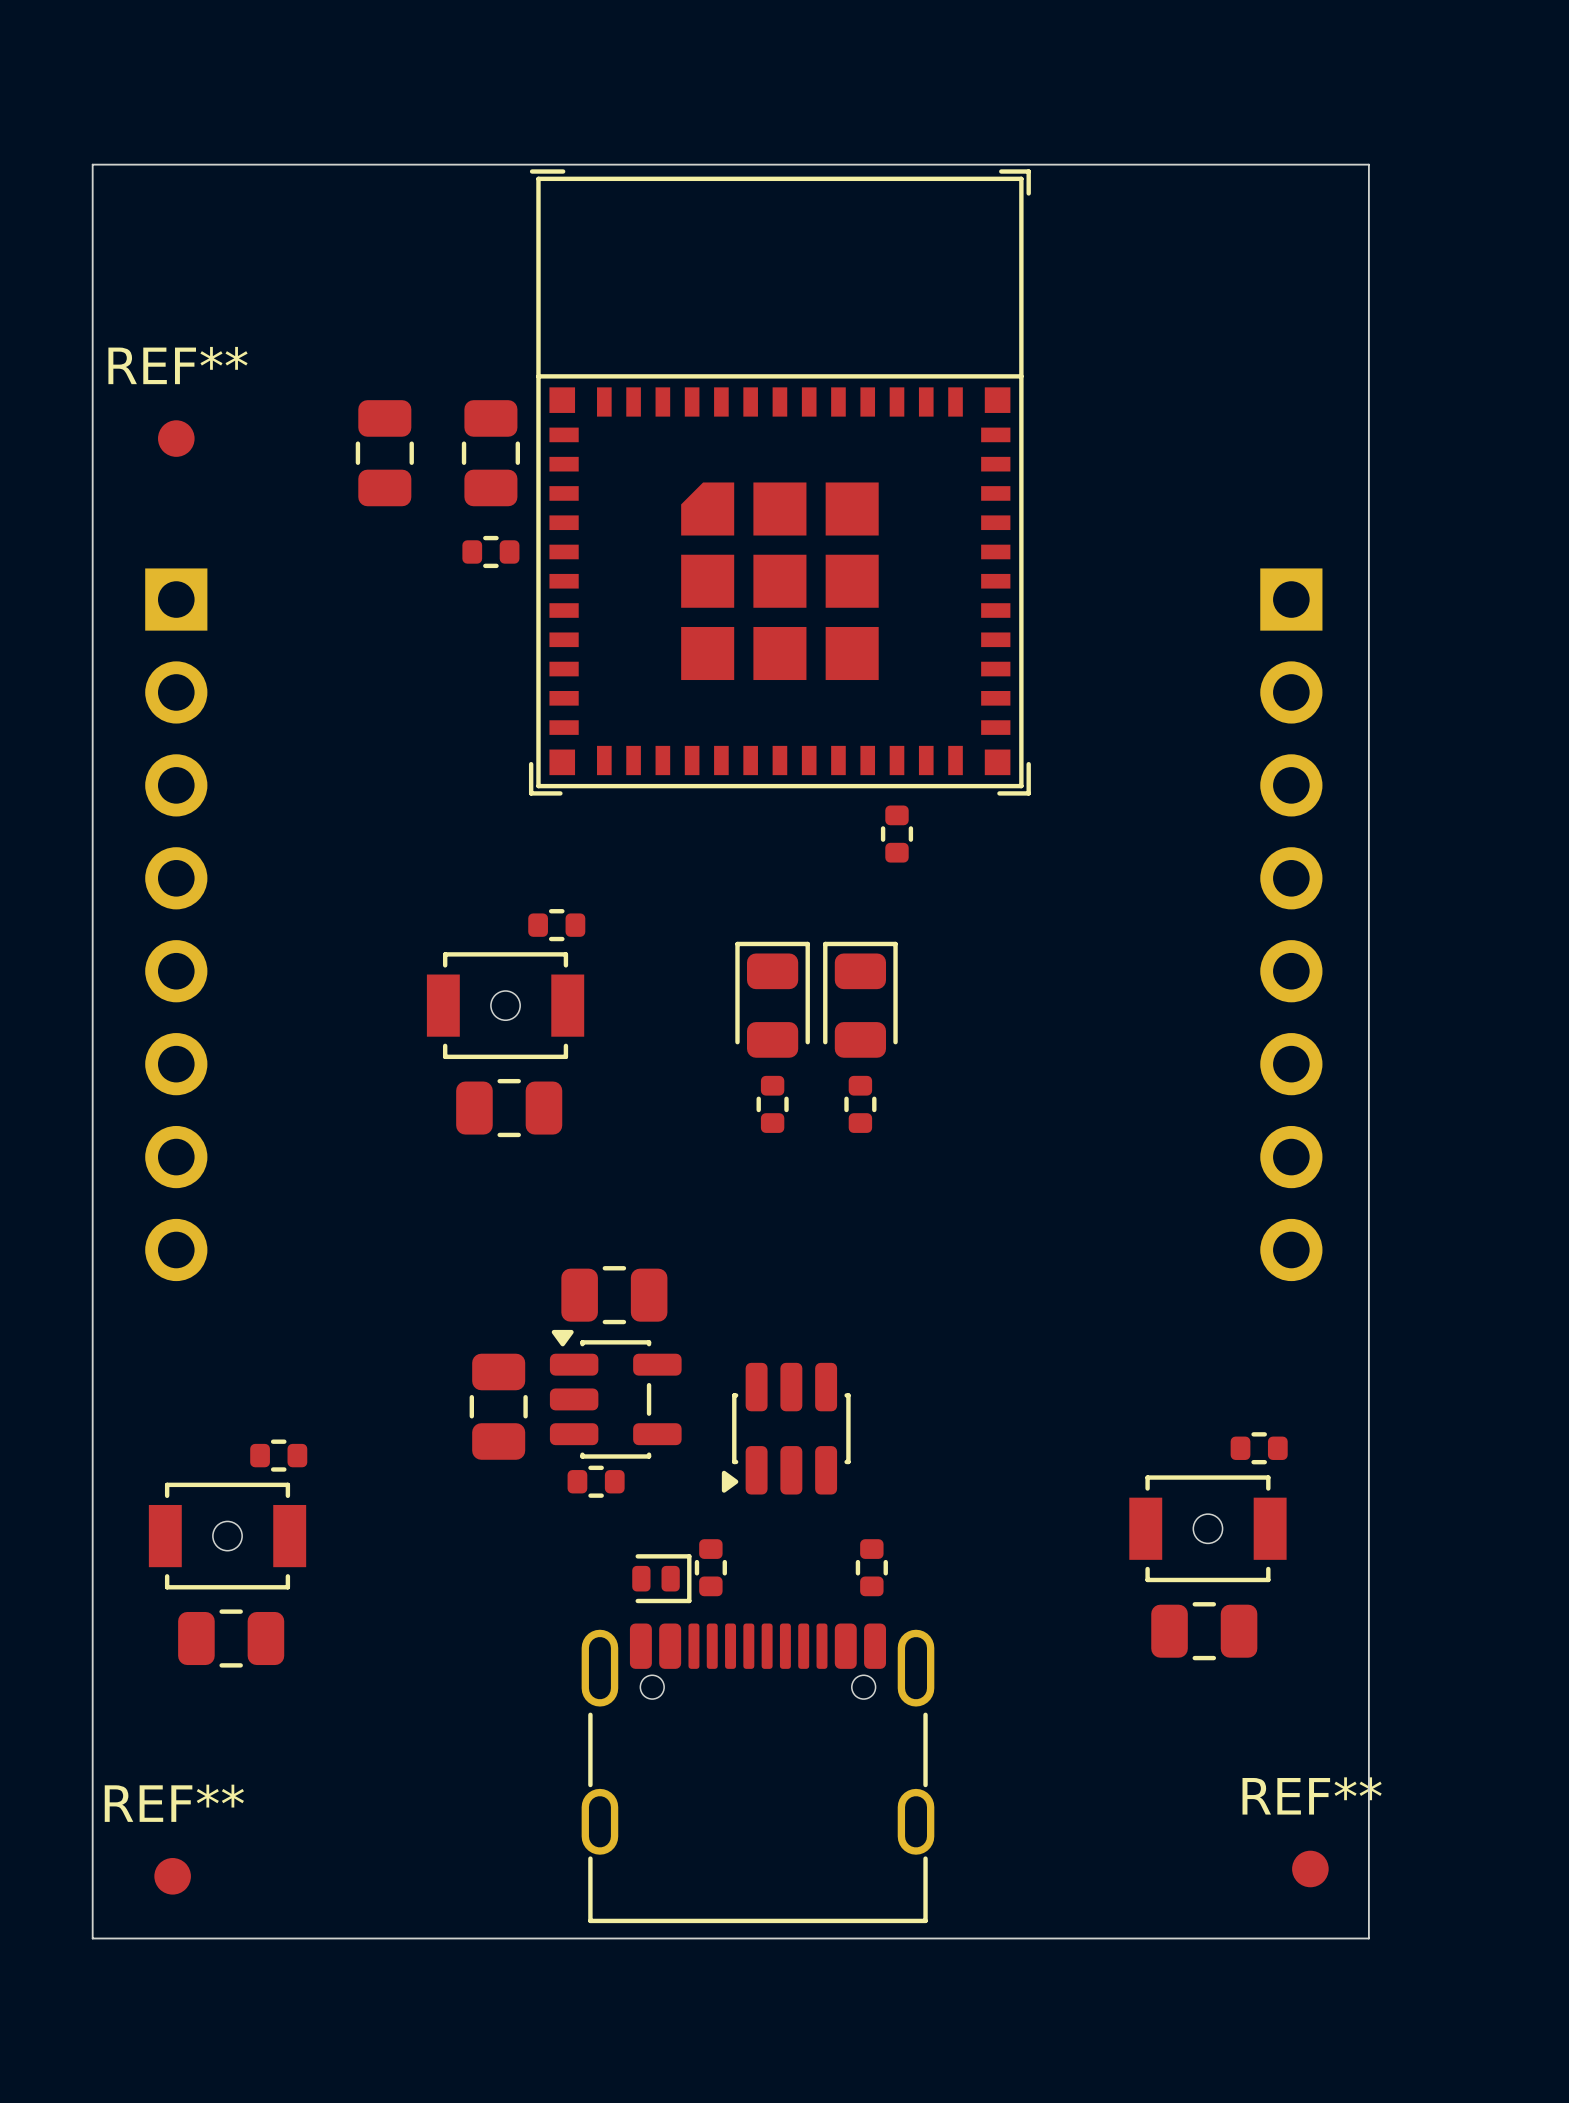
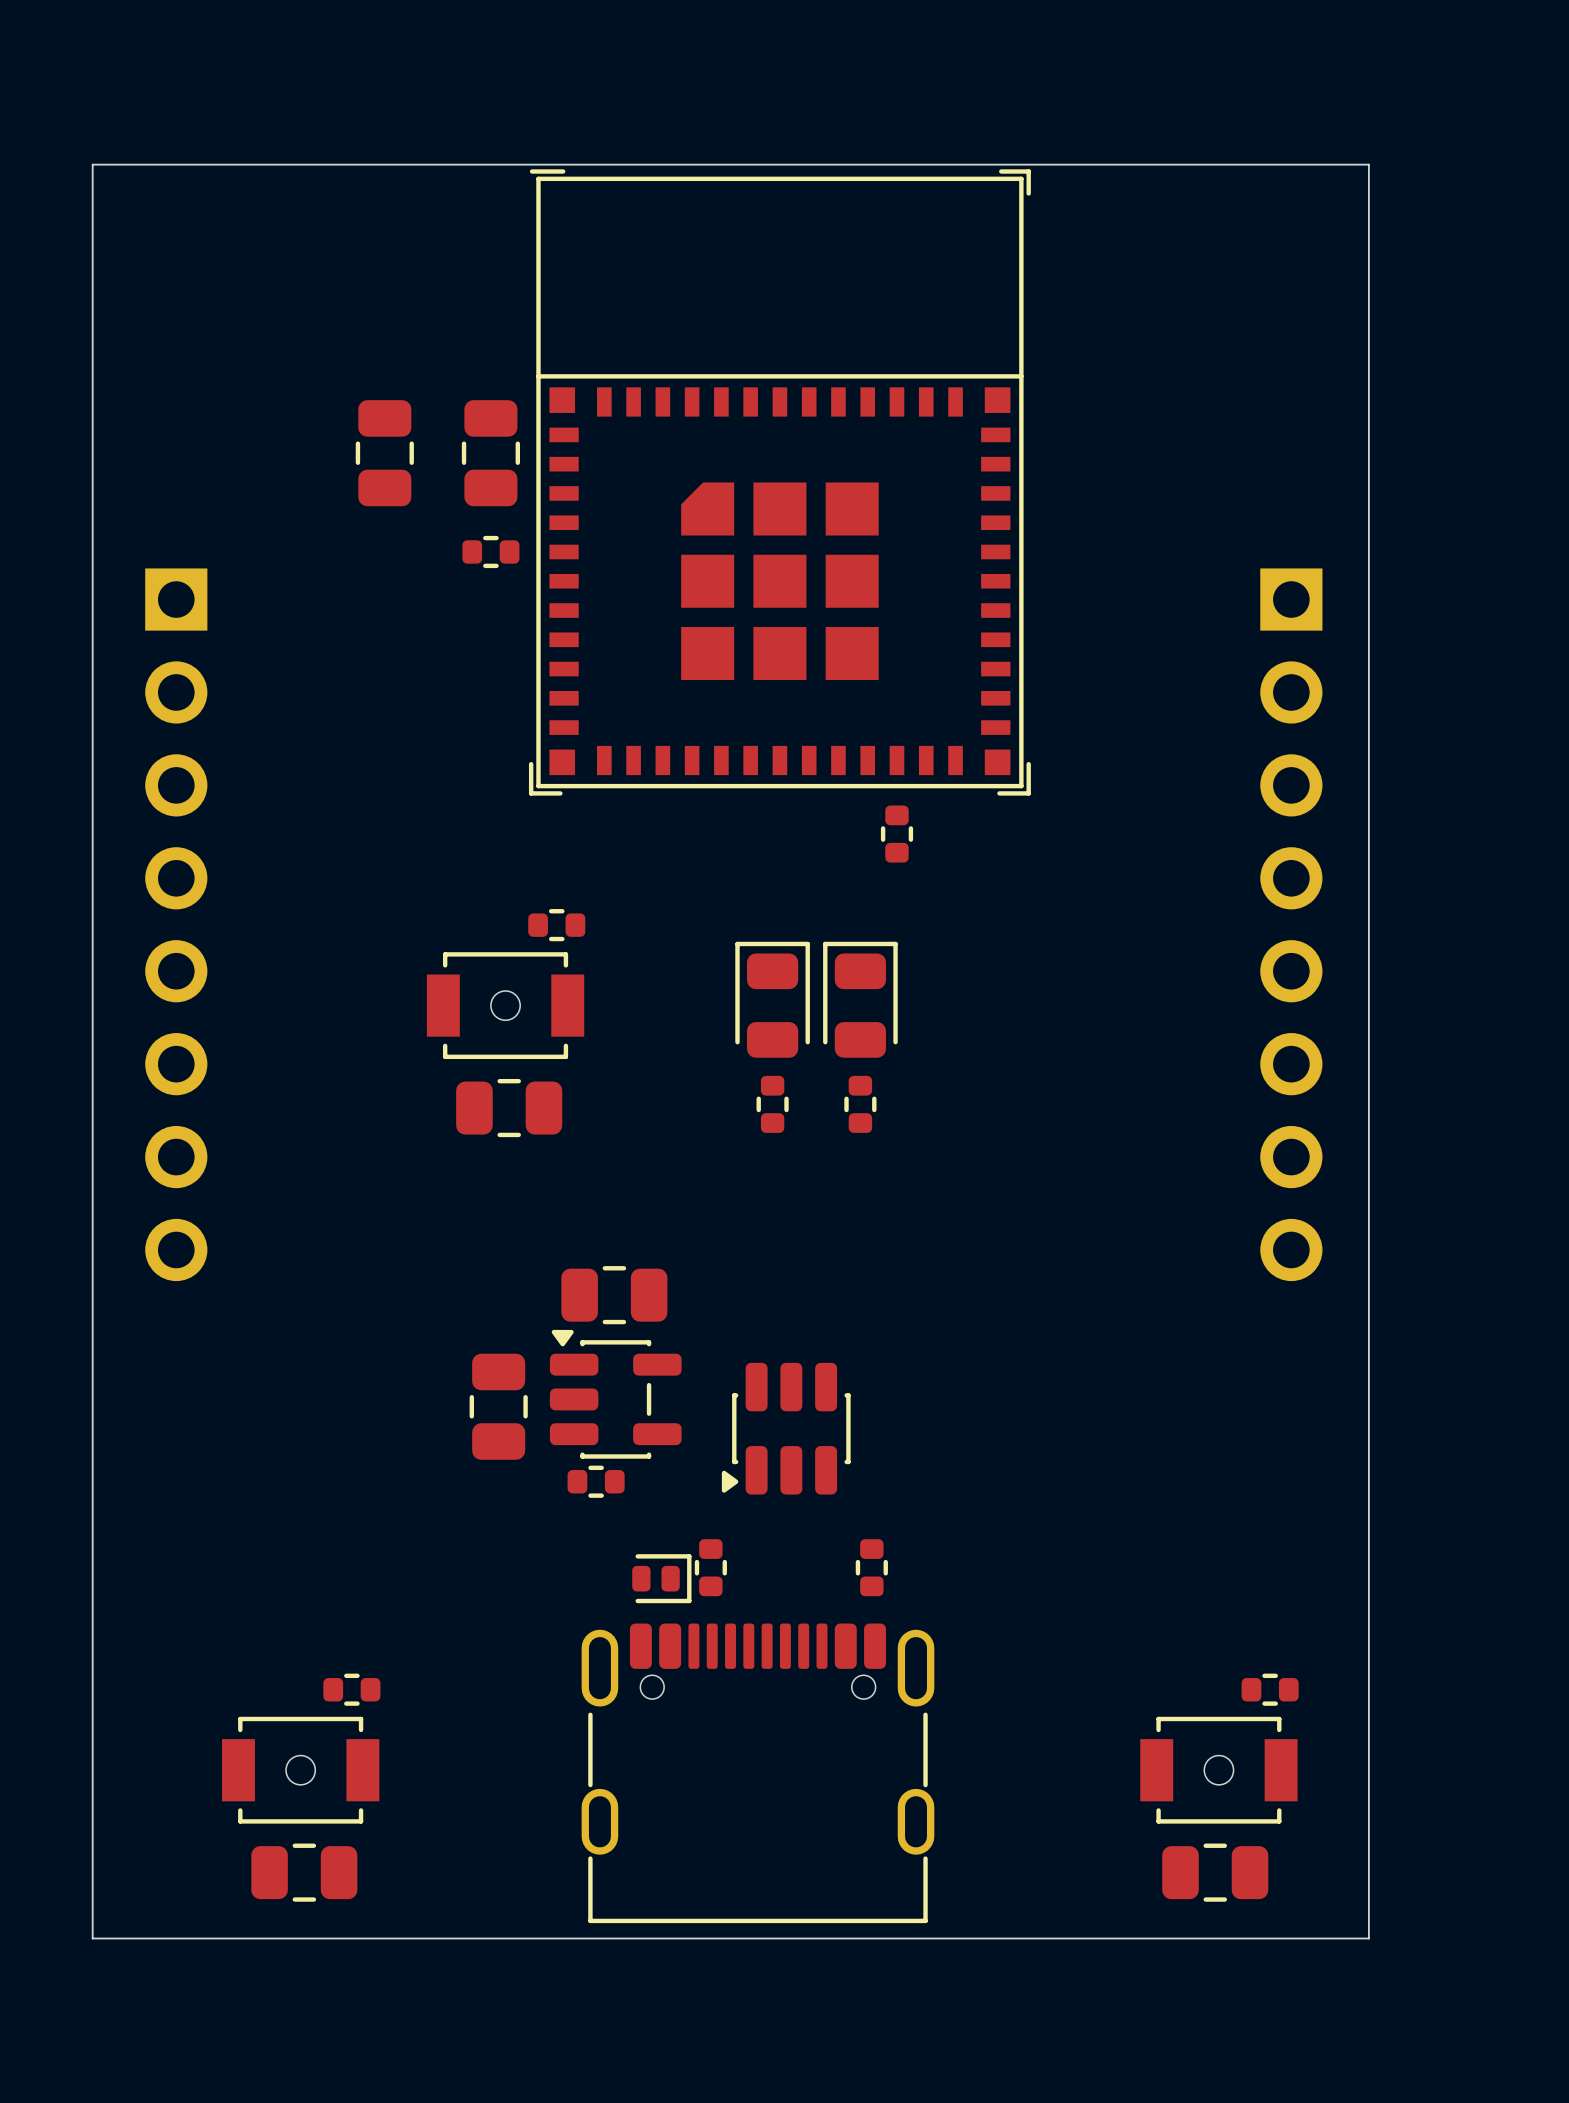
REF**: (176, 438) -> none
part position: (1259, 1448) -> (1270, 1689)
part position: (278, 1455) -> (351, 1689)
part position: (1207, 1528) -> (1218, 1770)
part position: (227, 1536) -> (300, 1770)
part position: (1204, 1631) -> (1215, 1872)
part position: (231, 1638) -> (304, 1872)
REF**: (1310, 1868) -> none
REF**: (172, 1876) -> none

